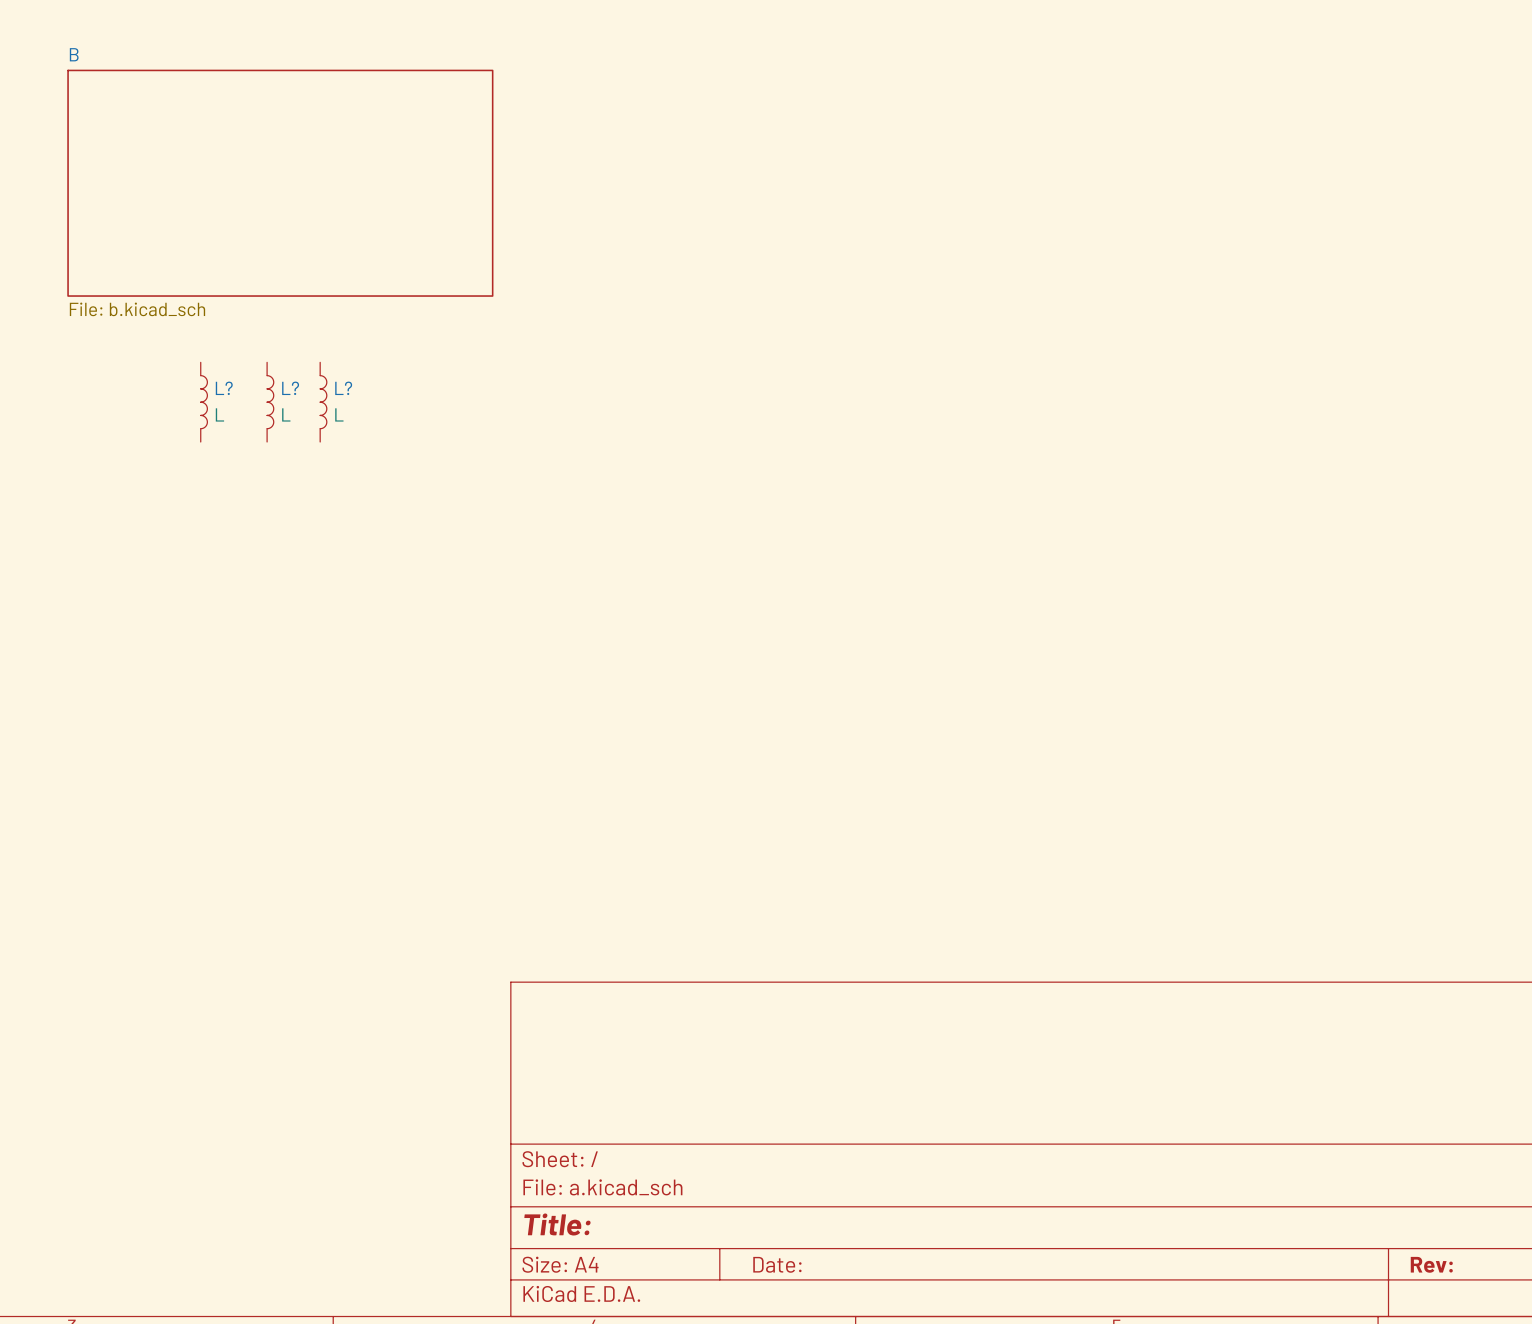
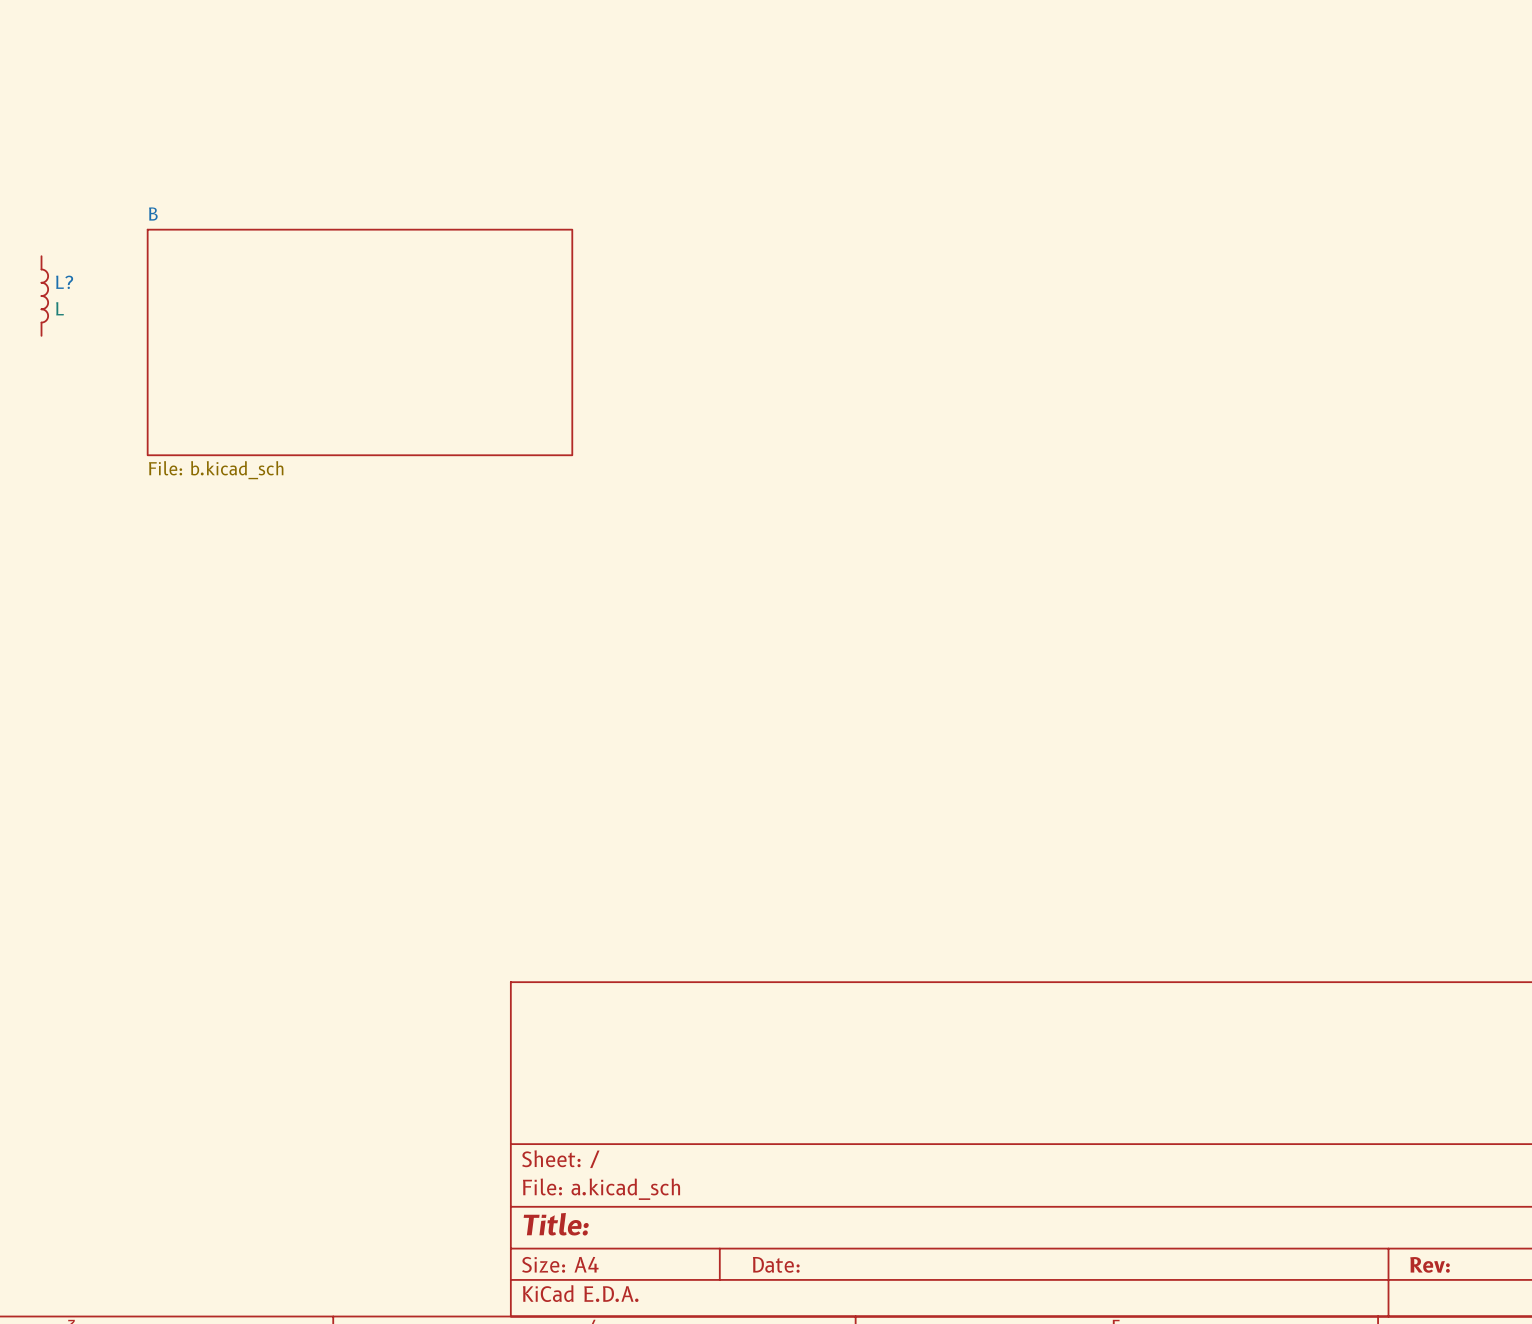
sheet B position: (280, 183) -> (359, 342)
L?: none -> L (44, 296)
L?: L (204, 402) -> none
L?: L (270, 402) -> none
L?: L (323, 402) -> none

